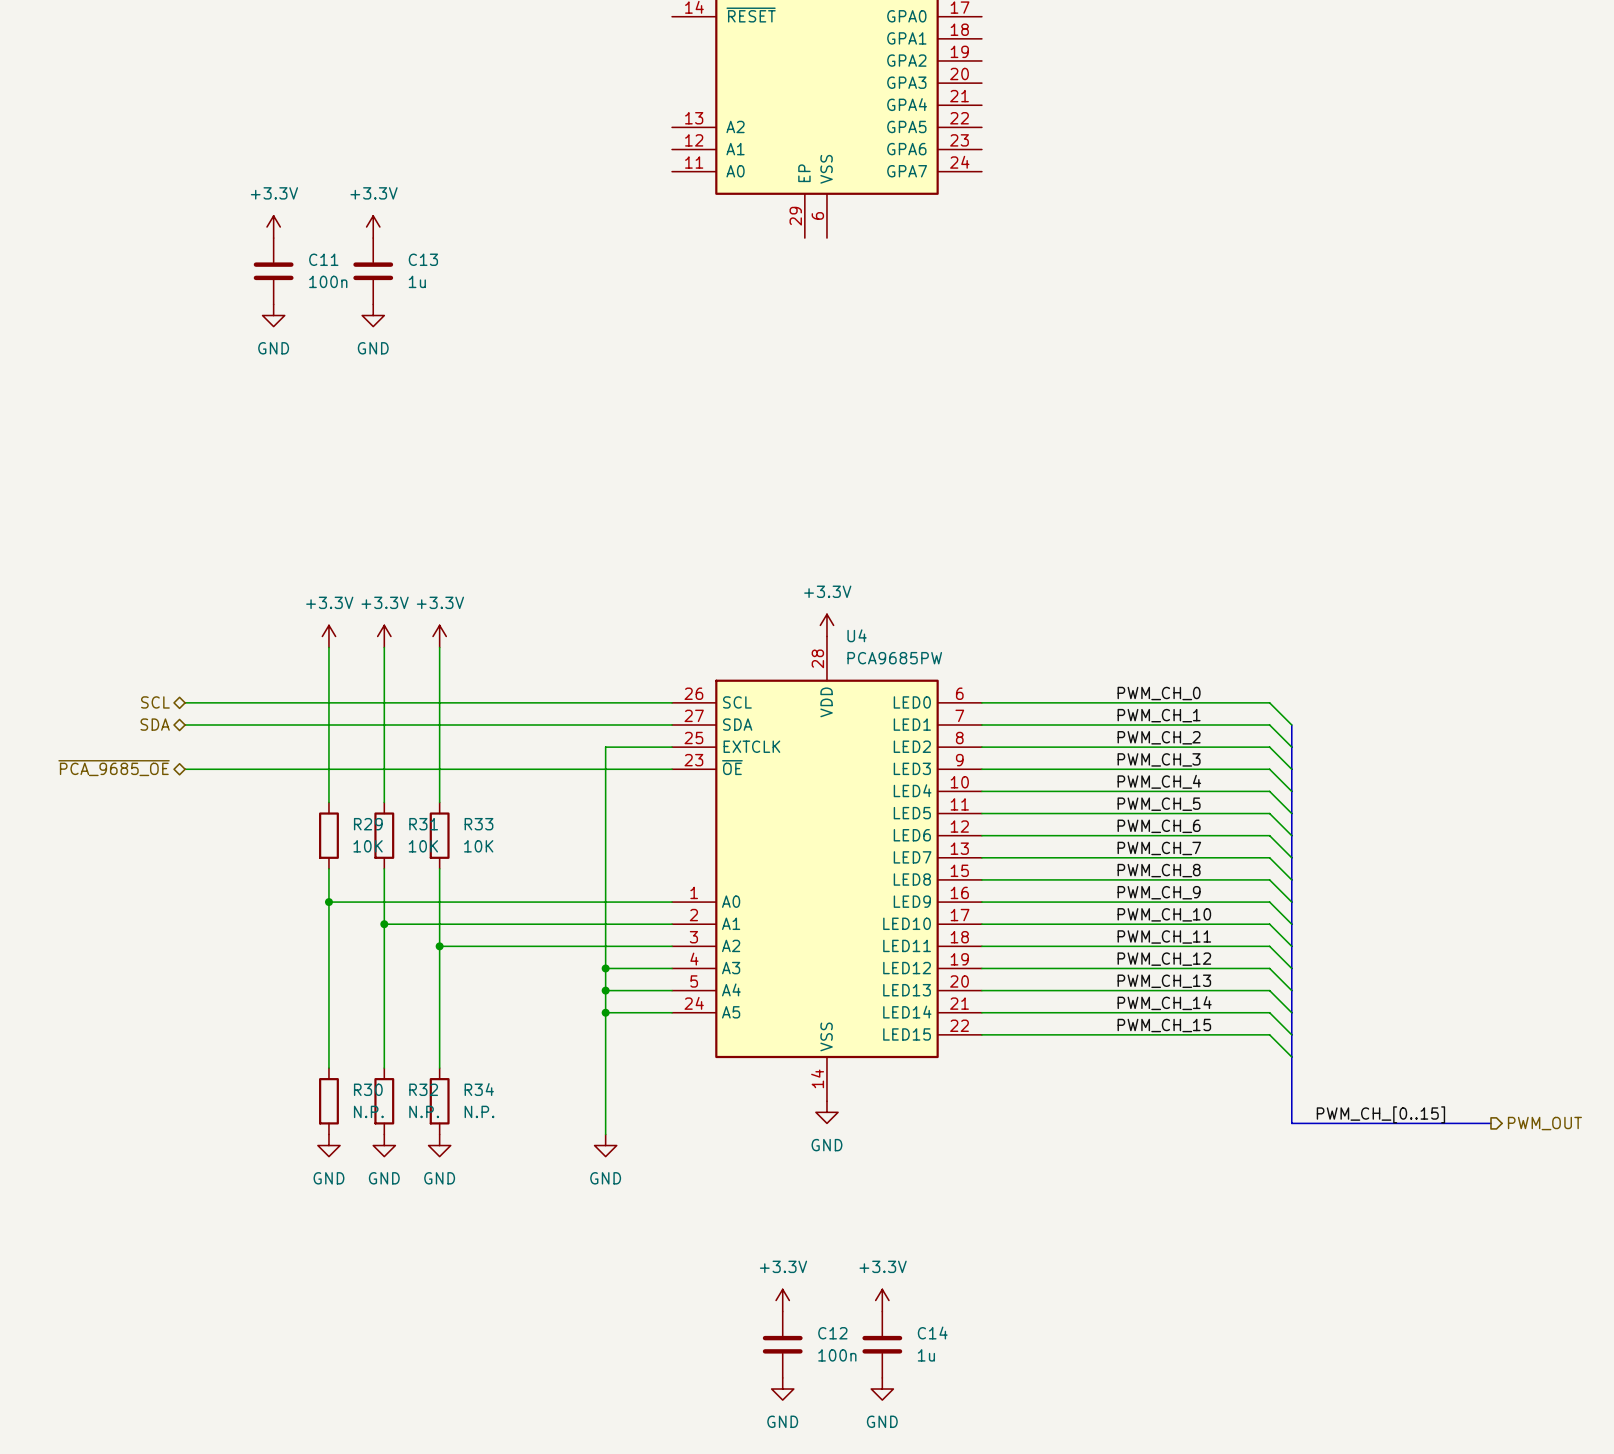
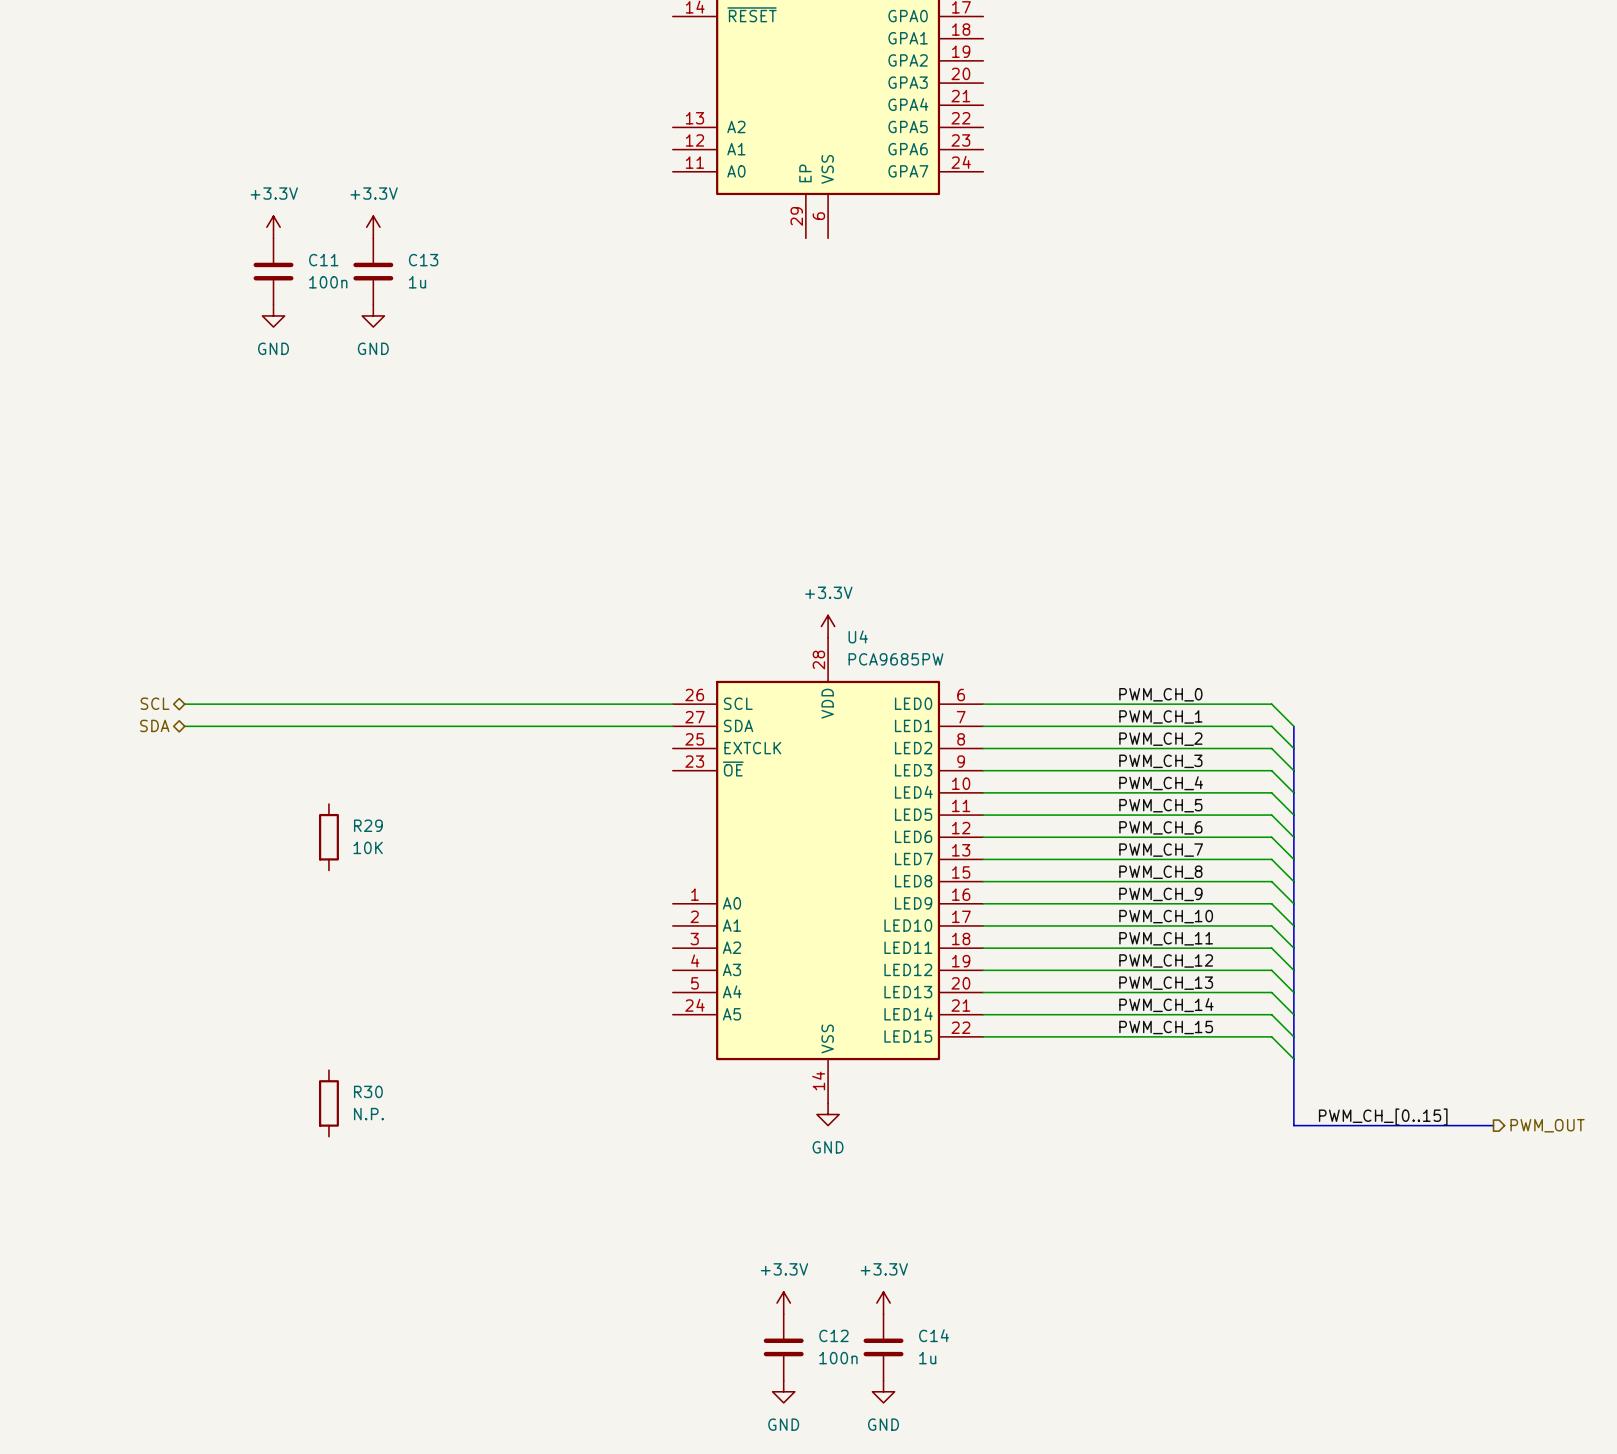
power symbol: +3.3V (328, 636) -> none
power symbol: +3.3V (384, 636) -> none
power symbol: +3.3V (439, 636) -> none
wire: (328, 647) (328, 802) -> none
wire: (384, 647) (384, 802) -> none
wire: (439, 647) (439, 802) -> none
wire: (672, 747) (605, 747) (605, 1134) -> none
hierarchical label: ~{PCA_9685_OE} (114, 768) -> none
wire: (185, 769) (672, 769) -> none
R31: 10K (384, 835) -> none
R33: 10K (439, 835) -> none
wire: (328, 868) (328, 1068) -> none
wire: (384, 868) (384, 1068) -> none
wire: (439, 868) (439, 1068) -> none
wire: (328, 902) (672, 902) -> none
junction: (328, 902) -> none
wire: (384, 924) (672, 924) -> none
junction: (384, 924) -> none
wire: (439, 946) (672, 946) -> none
junction: (439, 946) -> none
wire: (605, 968) (672, 968) -> none
junction: (605, 968) -> none
wire: (605, 990) (672, 990) -> none
junction: (605, 990) -> none
wire: (605, 1012) (672, 1012) -> none
junction: (605, 1012) -> none
R32: N.P. (384, 1101) -> none
R34: N.P. (439, 1101) -> none
power symbol: GND (328, 1145) -> none
power symbol: GND (384, 1145) -> none
power symbol: GND (439, 1145) -> none
power symbol: GND (605, 1145) -> none

